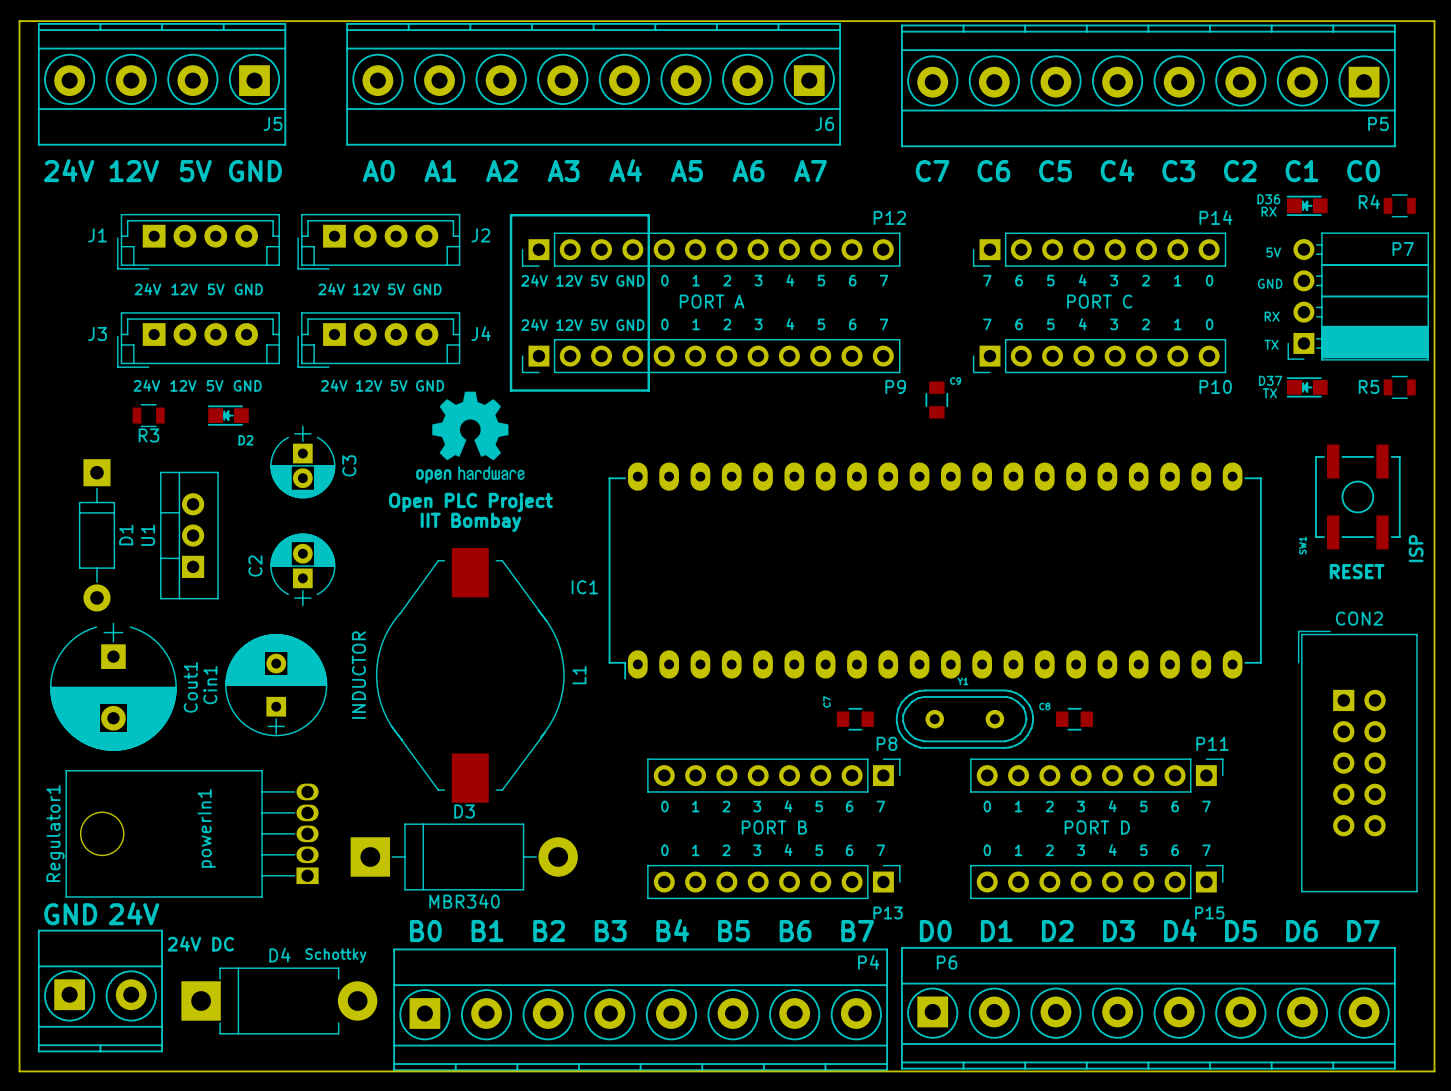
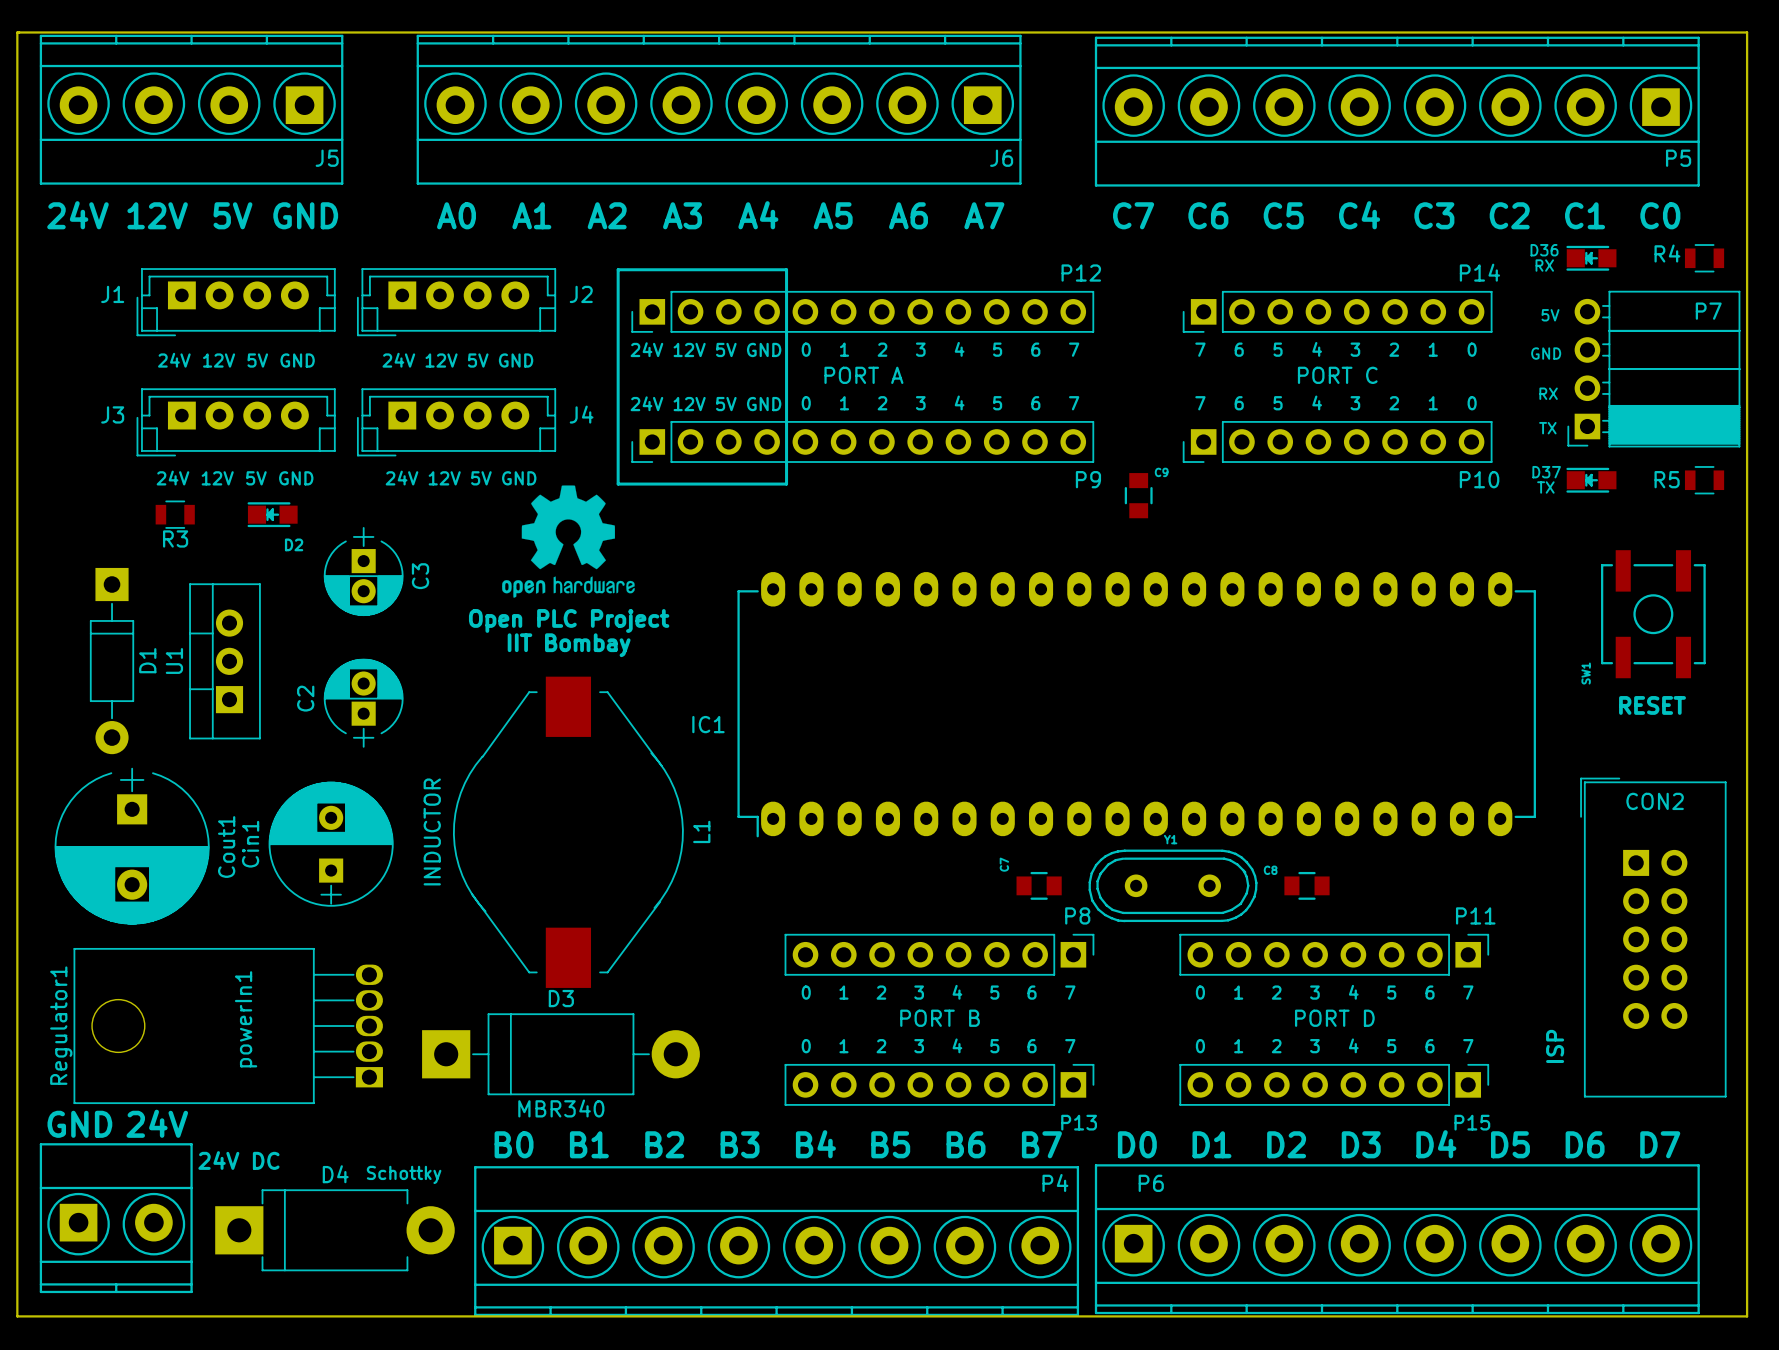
text: ISP (1416, 548) -> none
CON2 name position: CON2 (1359, 618) -> CON2 (1655, 801)
text: none -> ISP (1555, 1046)

